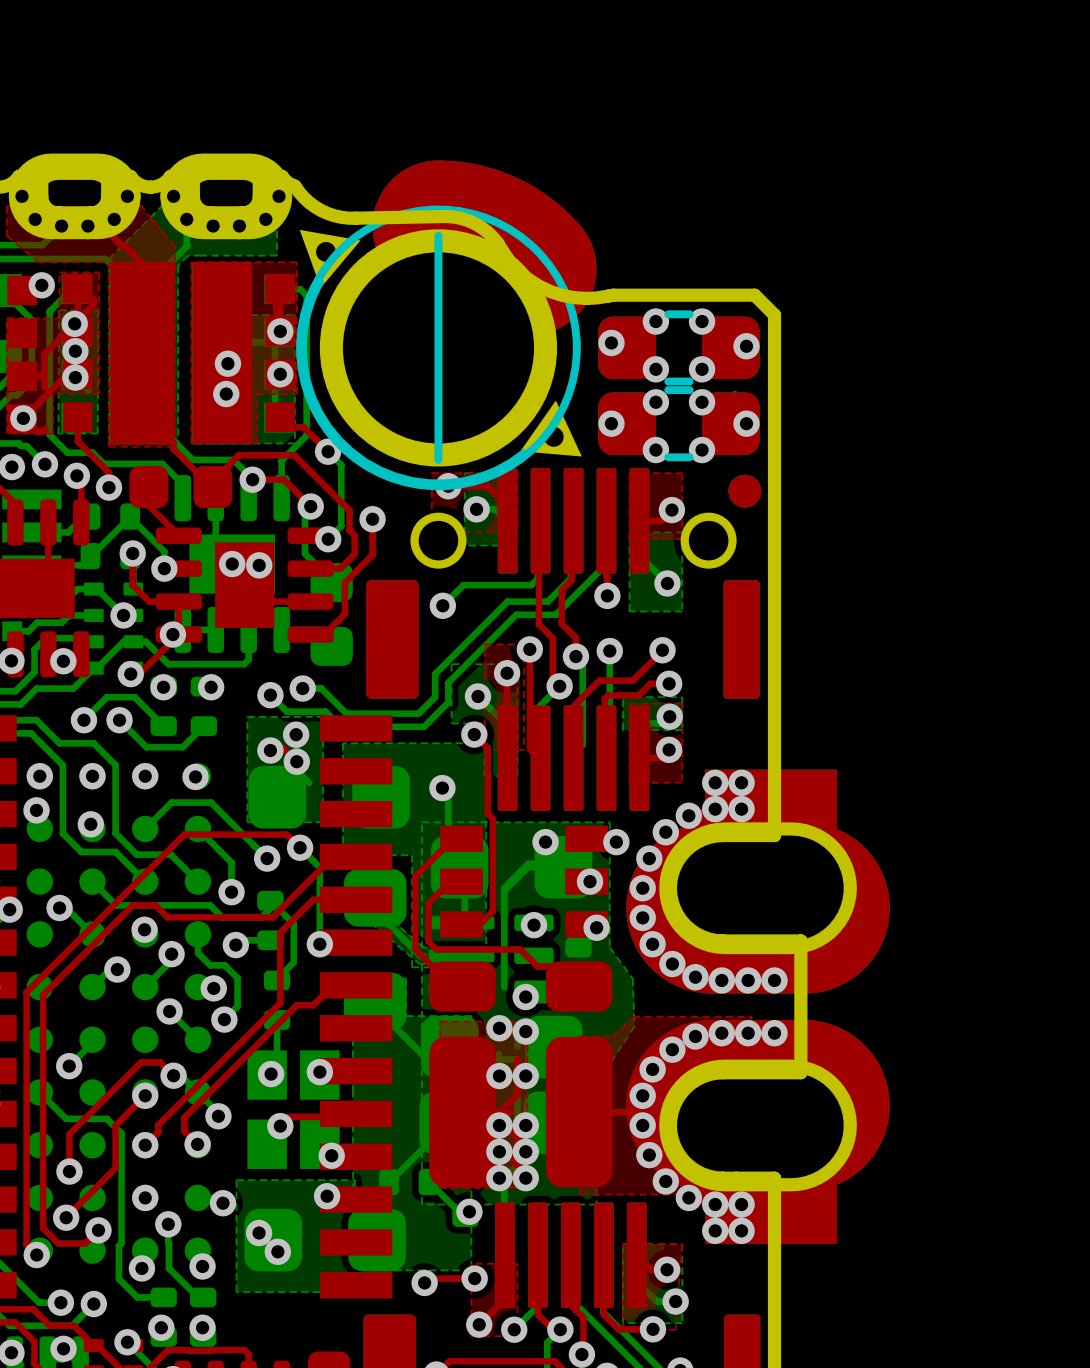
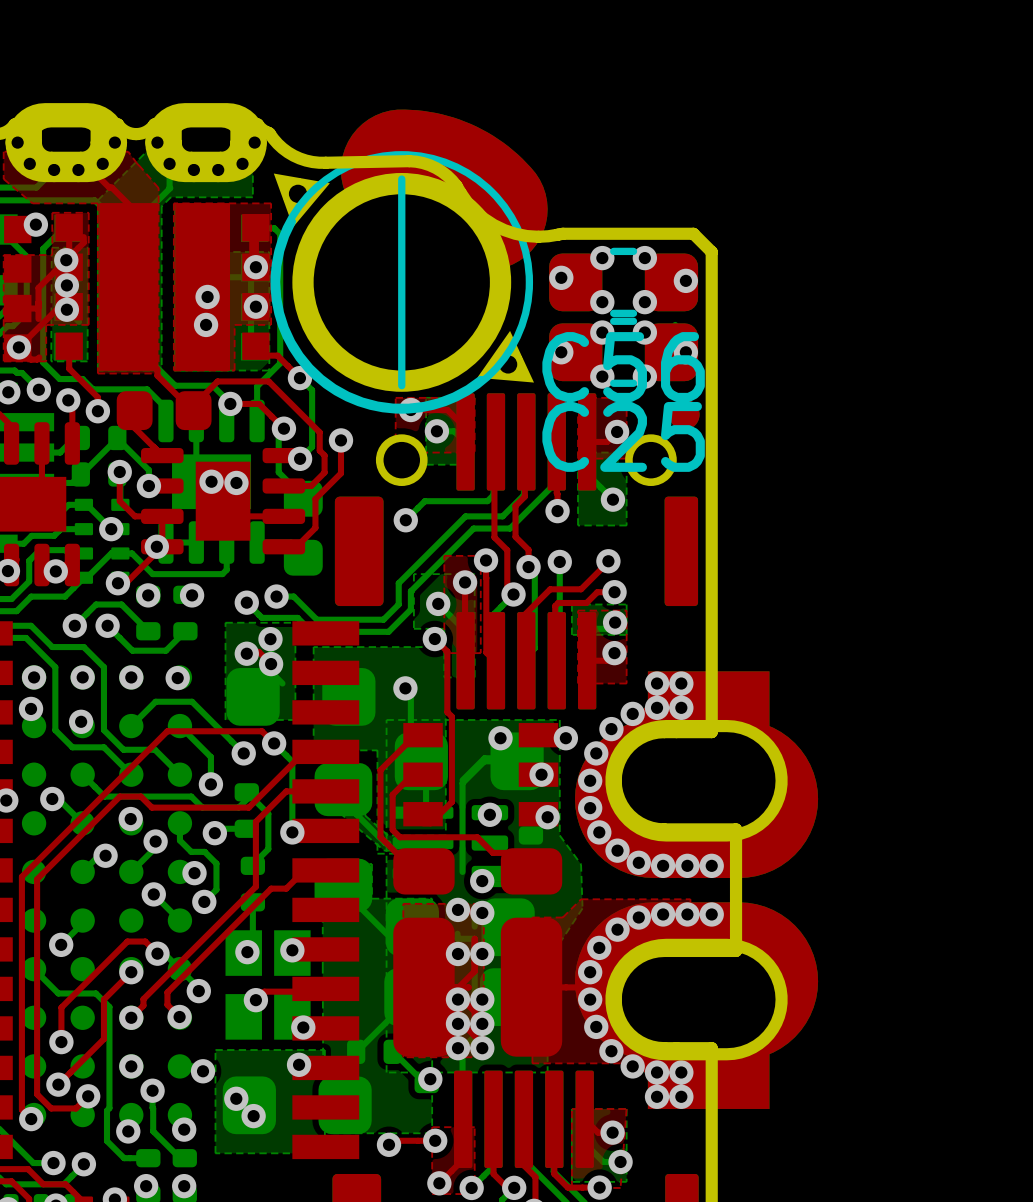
C56 name: none -> C56 (623, 367)
C25 name: none -> C25 (623, 436)

